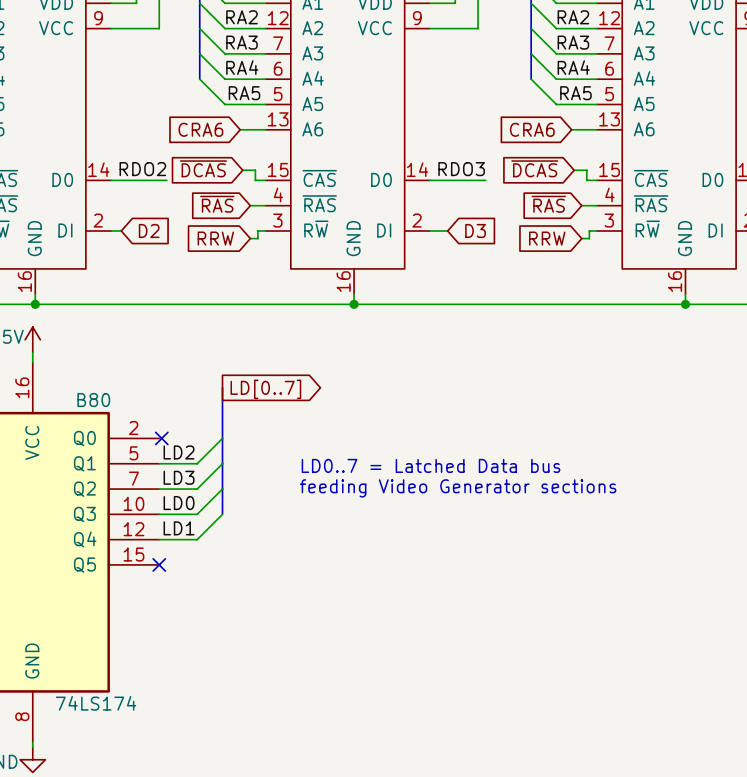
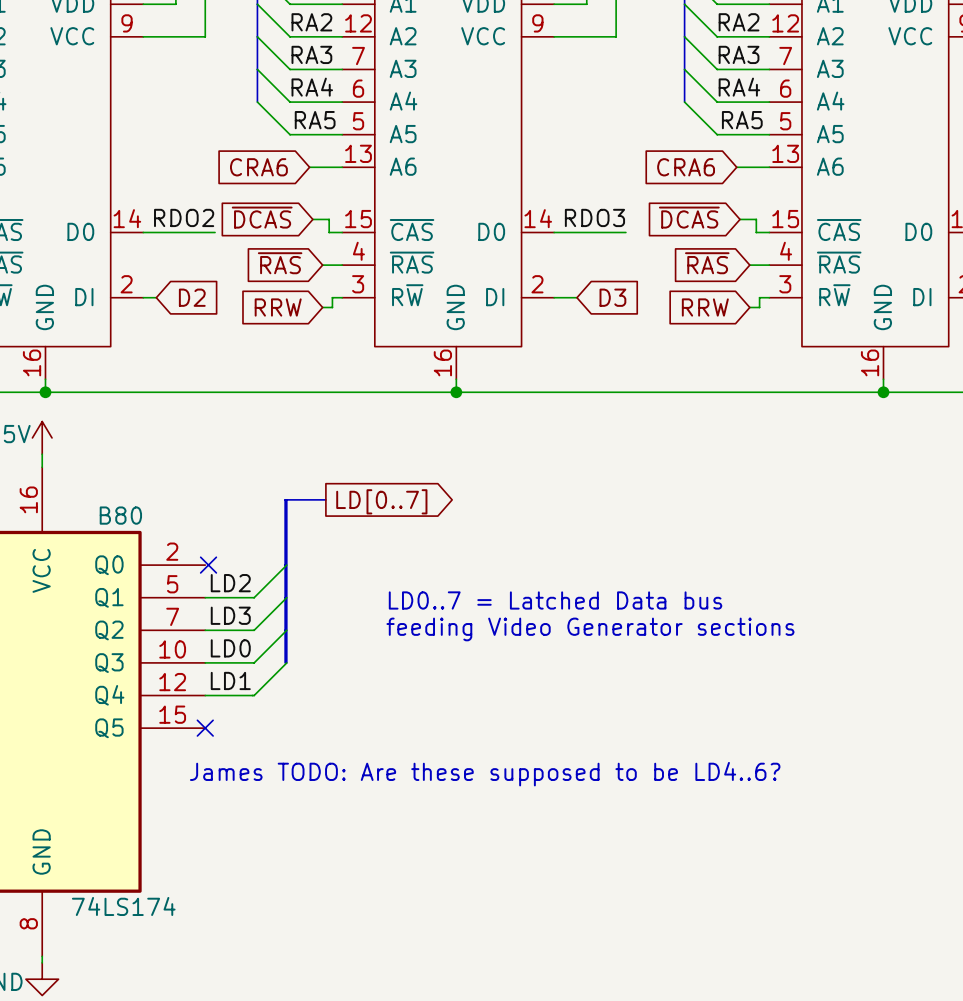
bus: none -> (325, 499) (285, 499) (285, 662)
global label position: LD[0..7] (265, 389) -> LD[0..7] (381, 501)
text: none -> James TODO: Are these supposed to be LD4..6? (485, 774)

